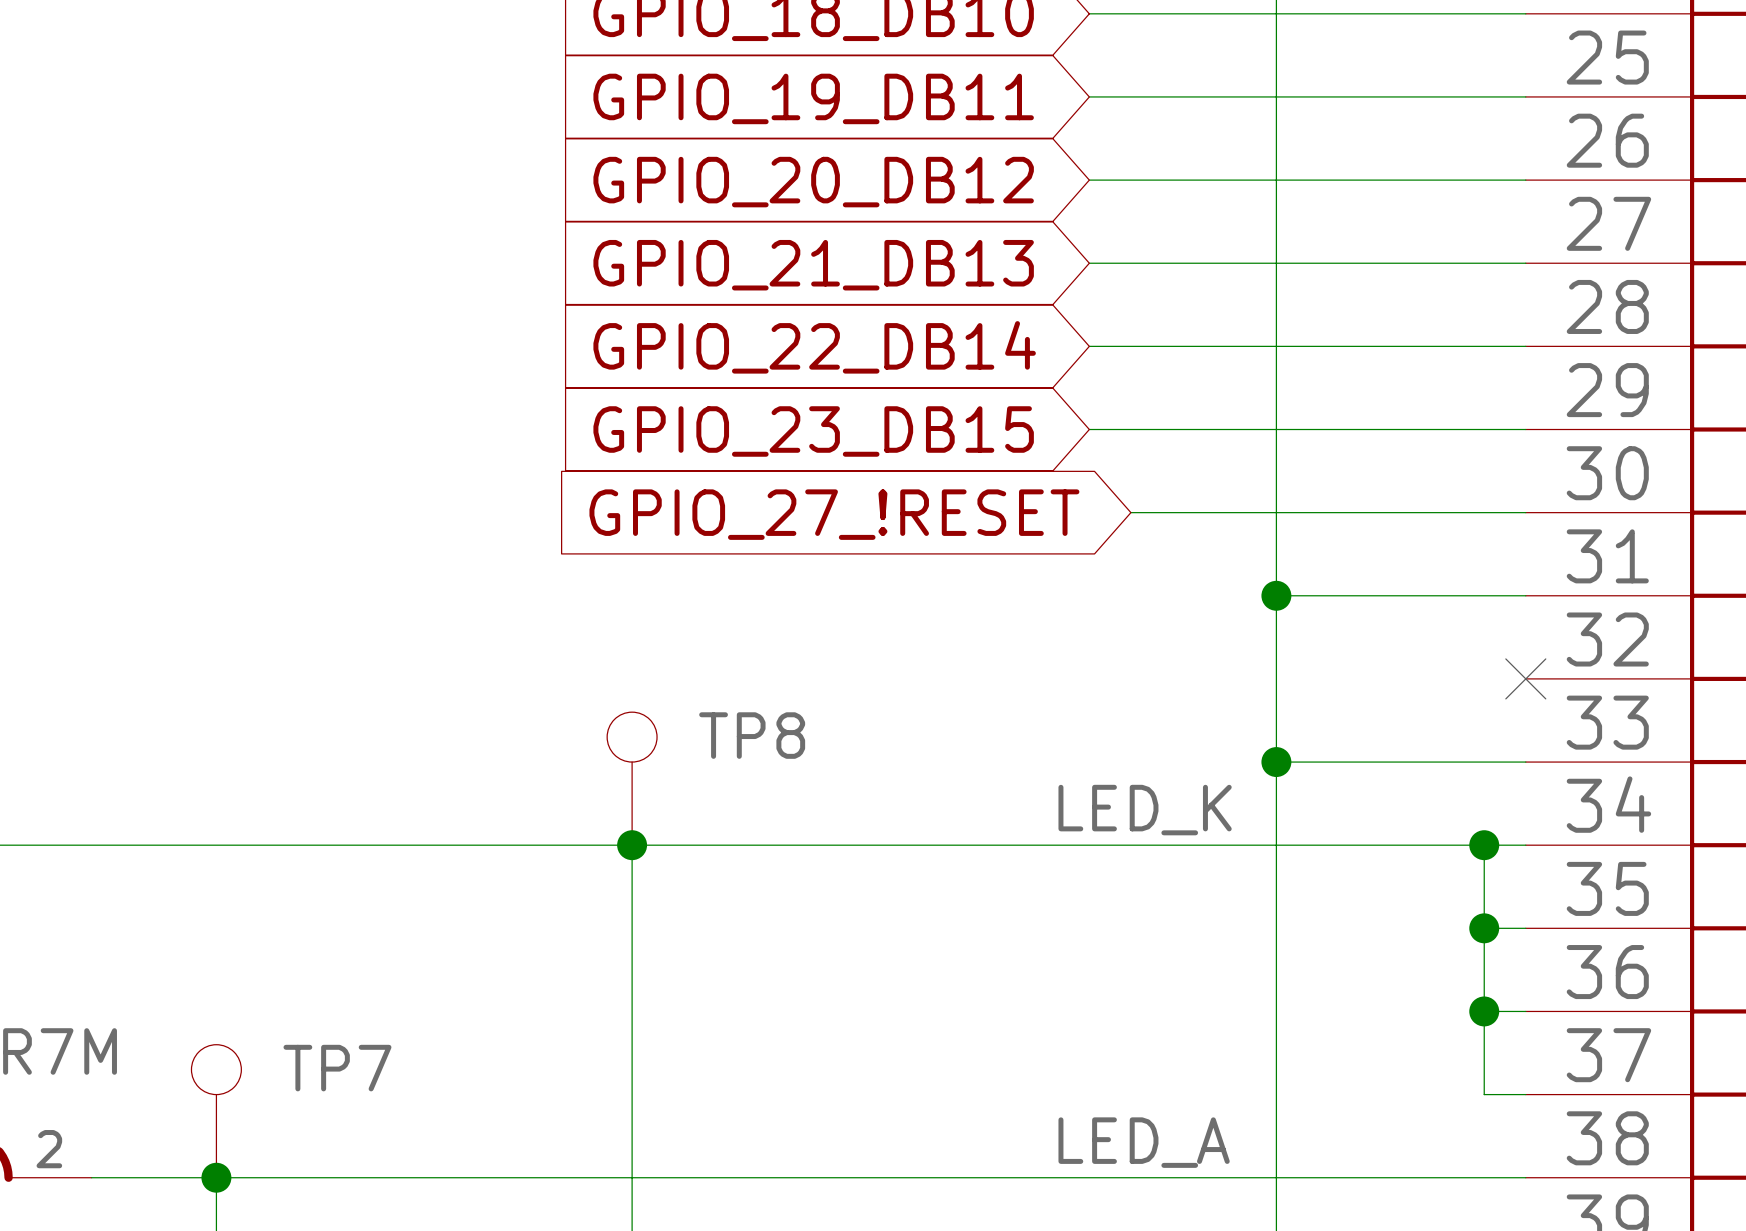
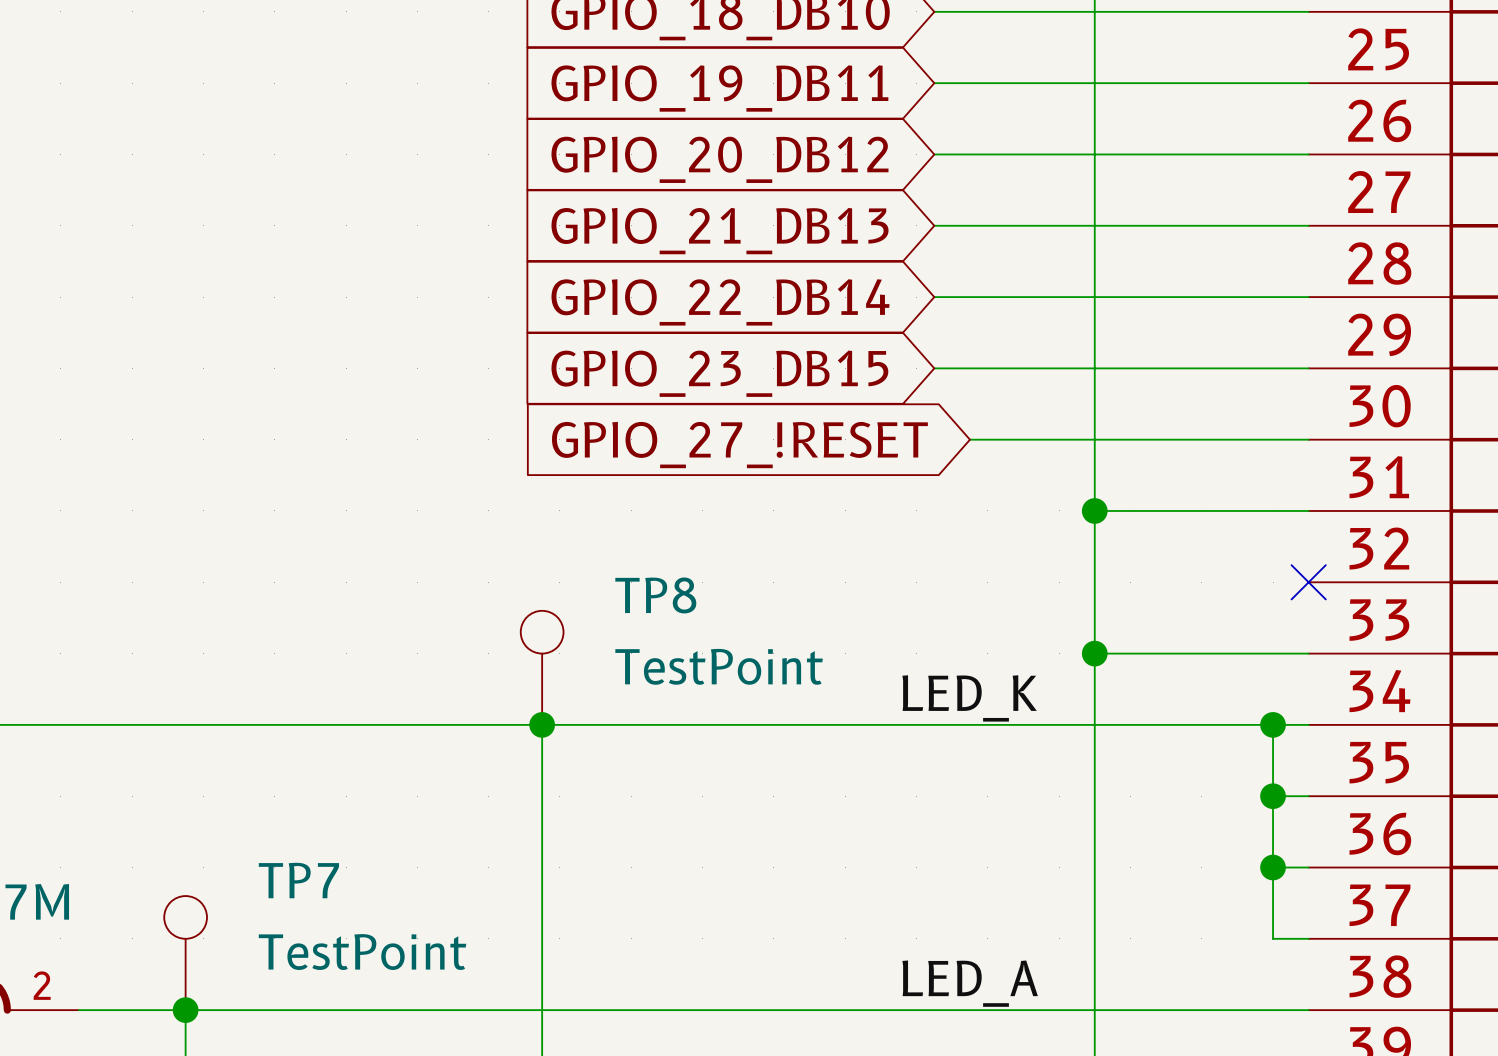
TP8 name position: TP8 (752, 735) -> TP8 (655, 595)
TP8 value: none -> TestPoint (719, 666)
TP7 name position: TP7 (337, 1068) -> TP7 (298, 880)
TP7 value: none -> TestPoint (362, 952)

